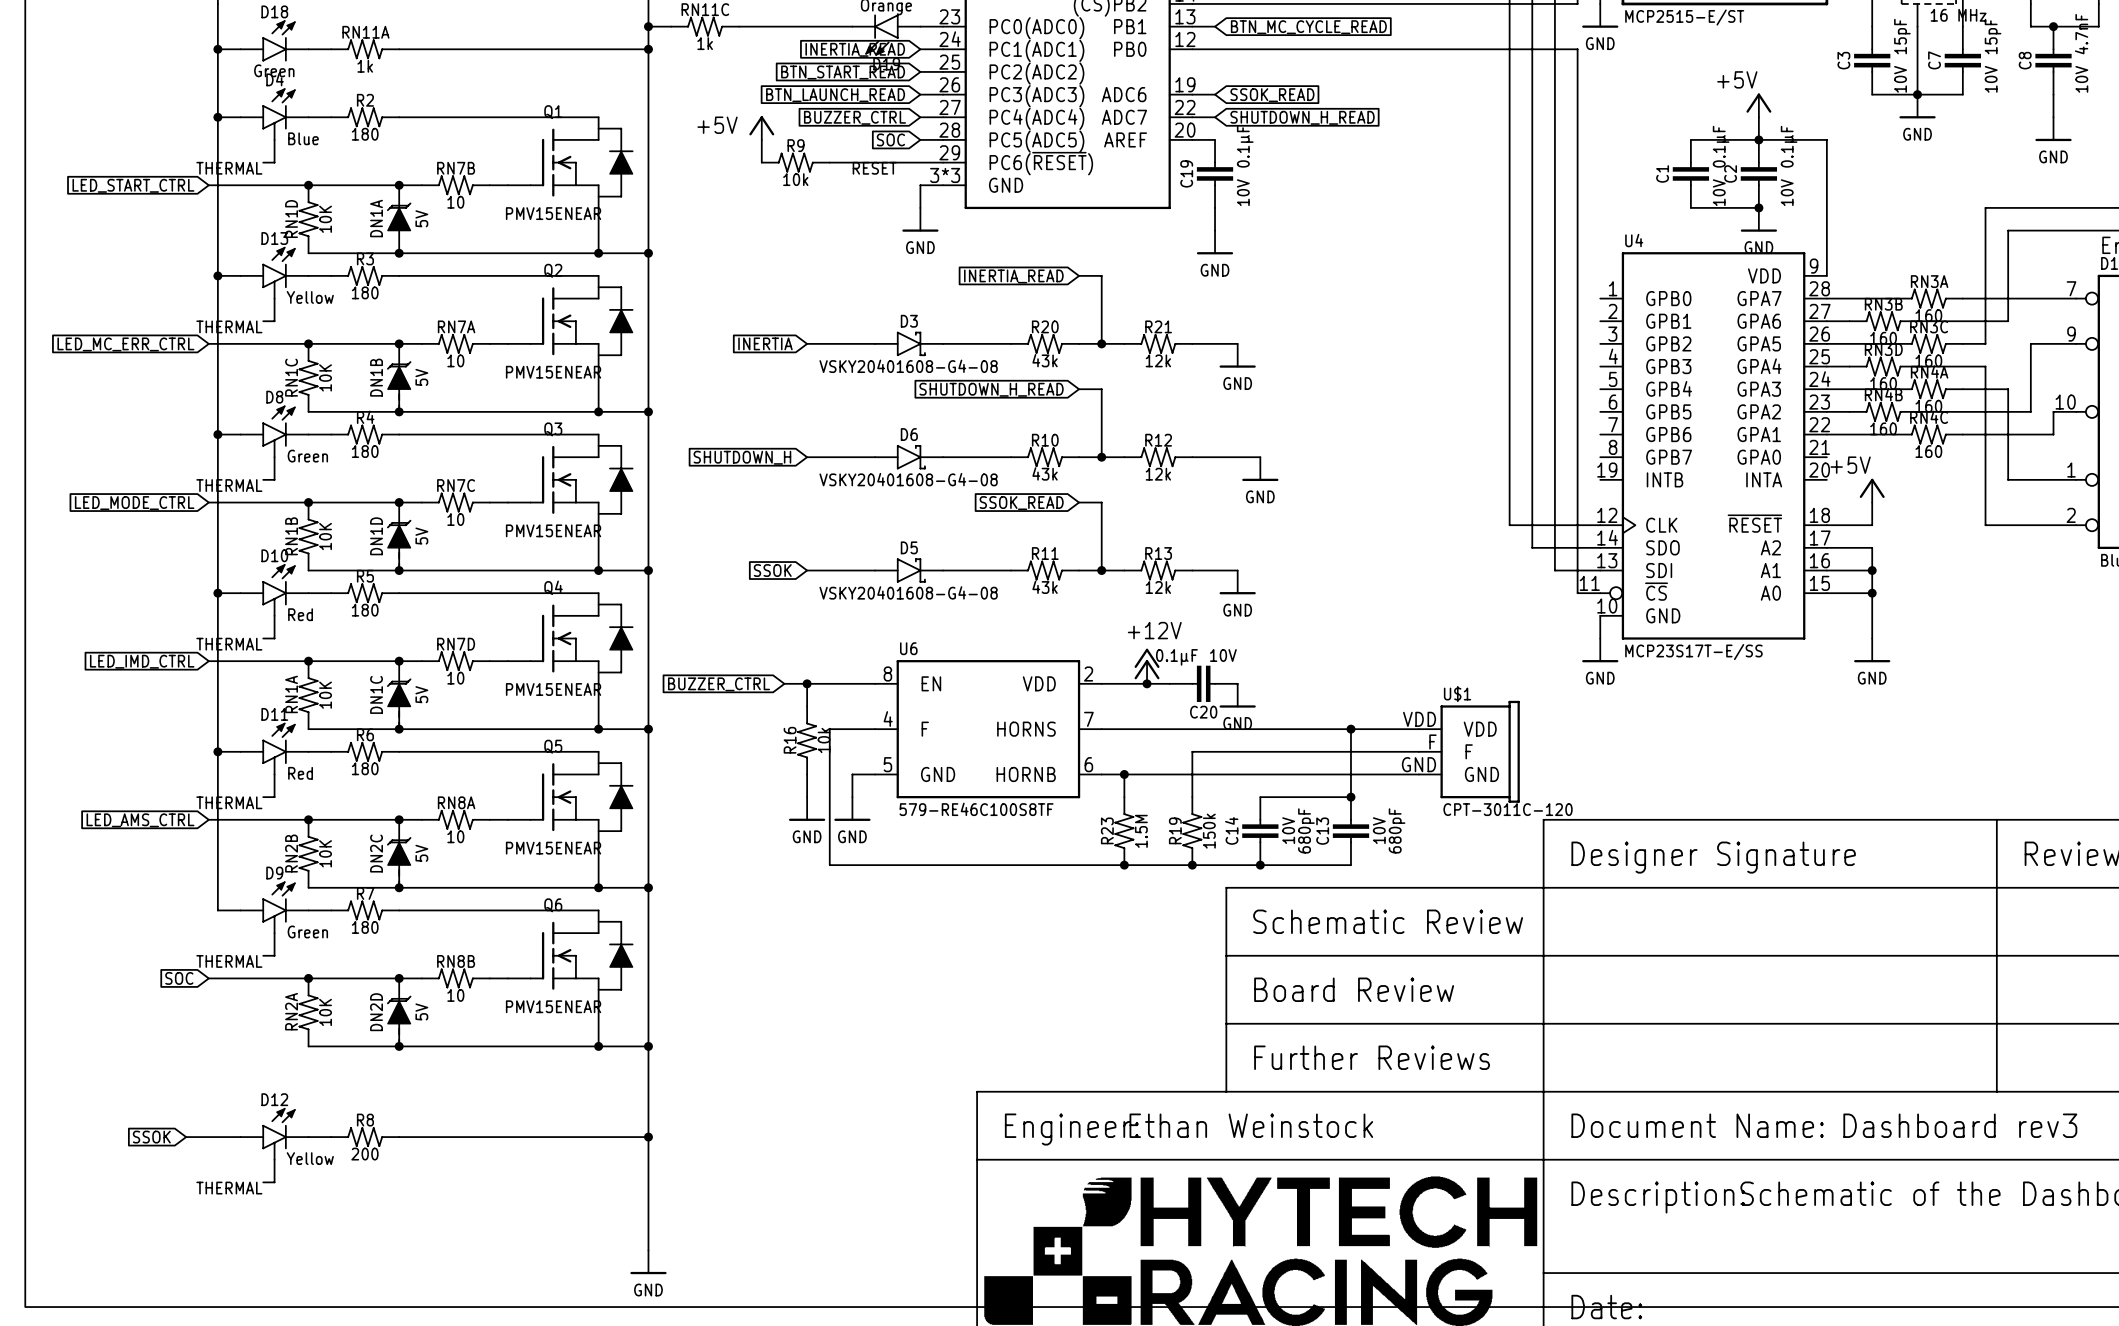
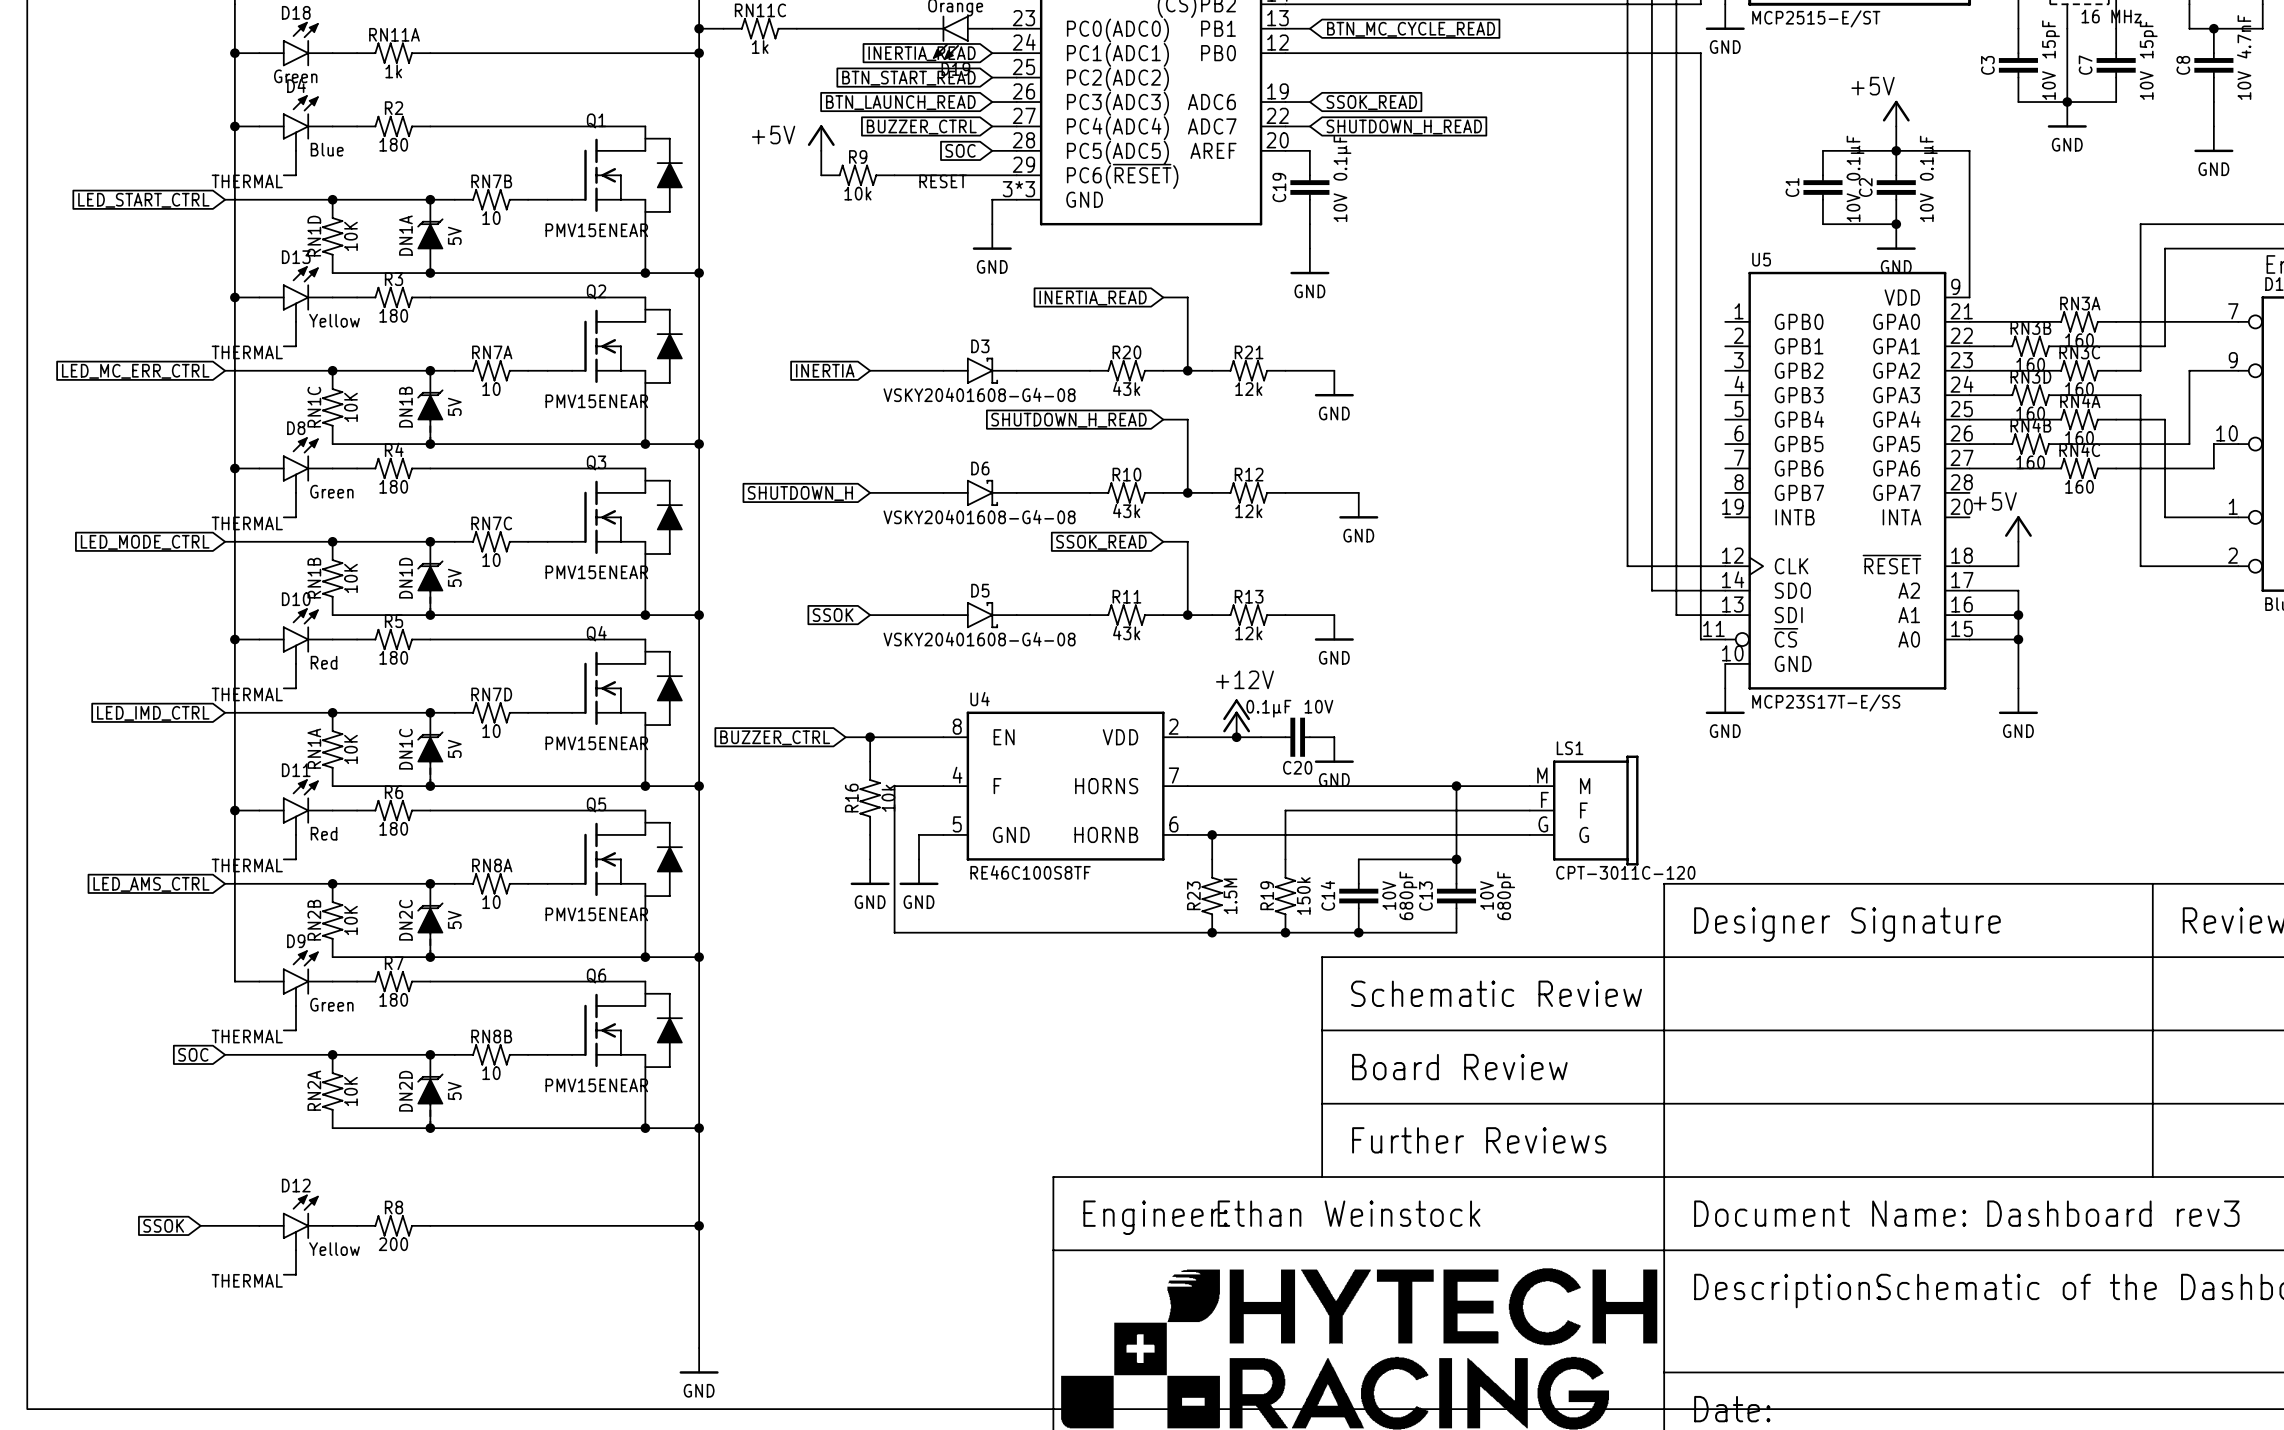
U4 name: U4 (1634, 240) -> U5 (1761, 259)
U4 symbol: [1600, 252, 1827, 640] -> [1725, 271, 1970, 690]
U6 name: U6 (908, 648) -> U4 (980, 699)
U$1 name: U$1 (1457, 694) -> LS1 (1570, 748)
U$1 pin number: VDD (1419, 719) -> M (1542, 775)
U$1 pin name: VDD (1480, 729) -> M (1585, 786)
U$1 pin number: GND (1418, 764) -> G (1543, 824)
U$1 pin name: GND (1481, 774) -> G (1584, 834)
U6 text: 579-RE46C100S8TF (976, 809) -> RE46C100S8TF (1030, 872)

